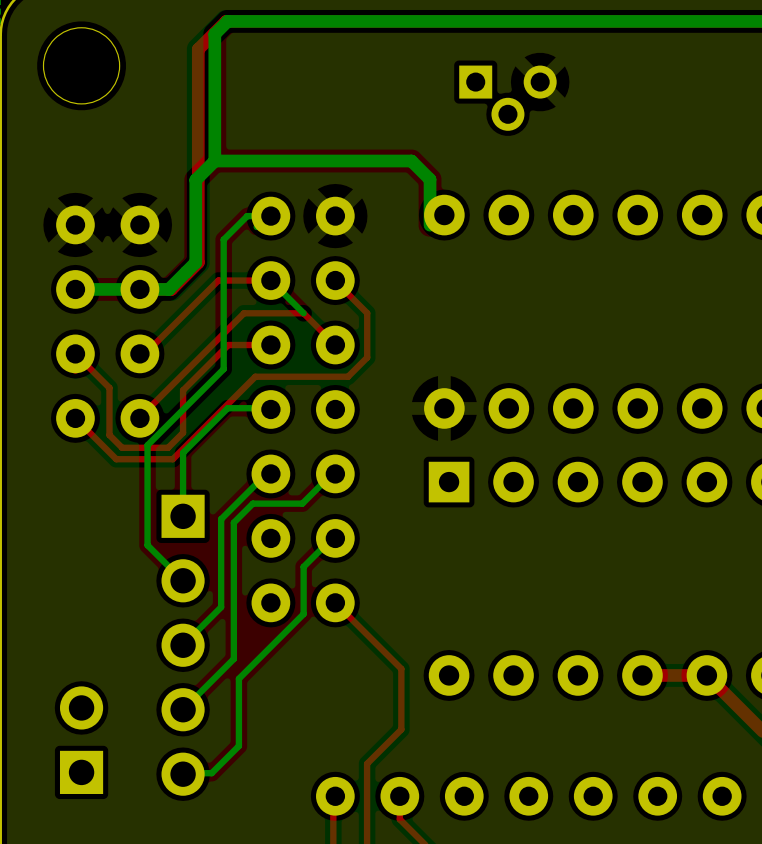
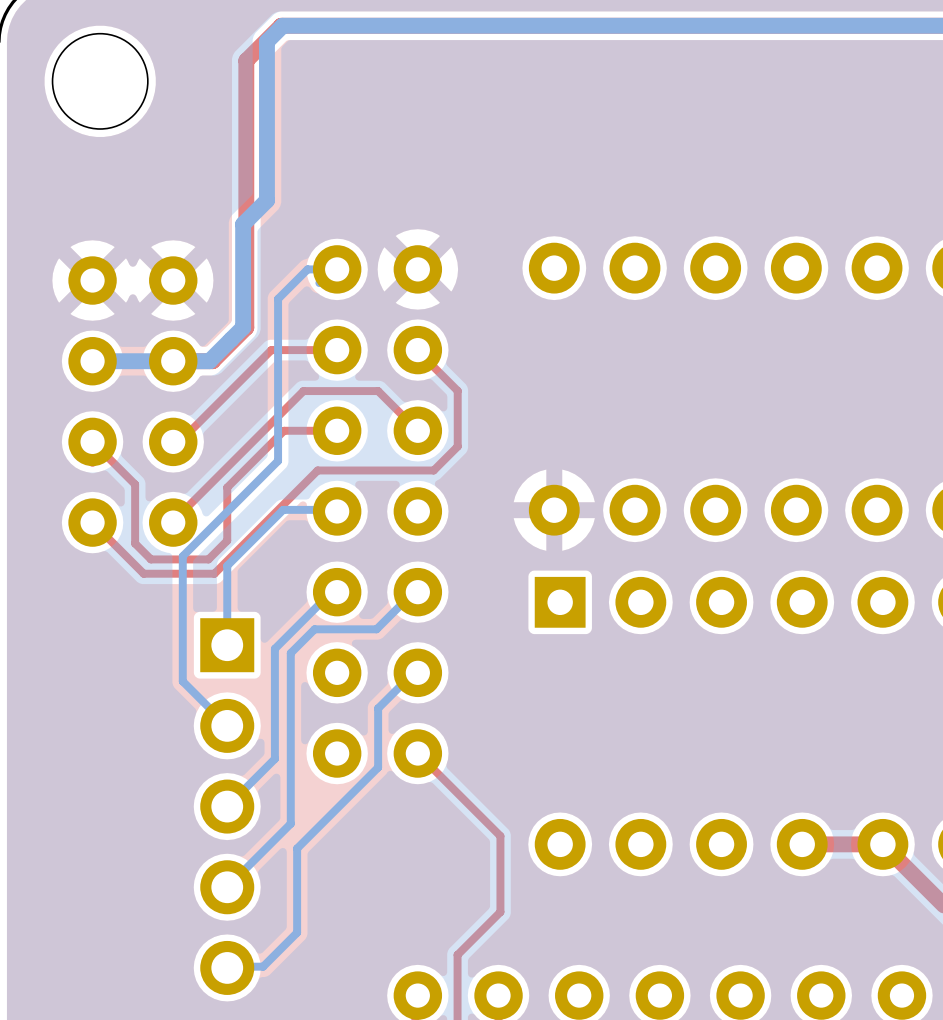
part: (507, 98) -> none
bottom track: (214, 161) (411, 161) (430, 179) (430, 225) -> none
bottom track: (270, 280) (303, 313) -> none
part: (81, 740) -> none

